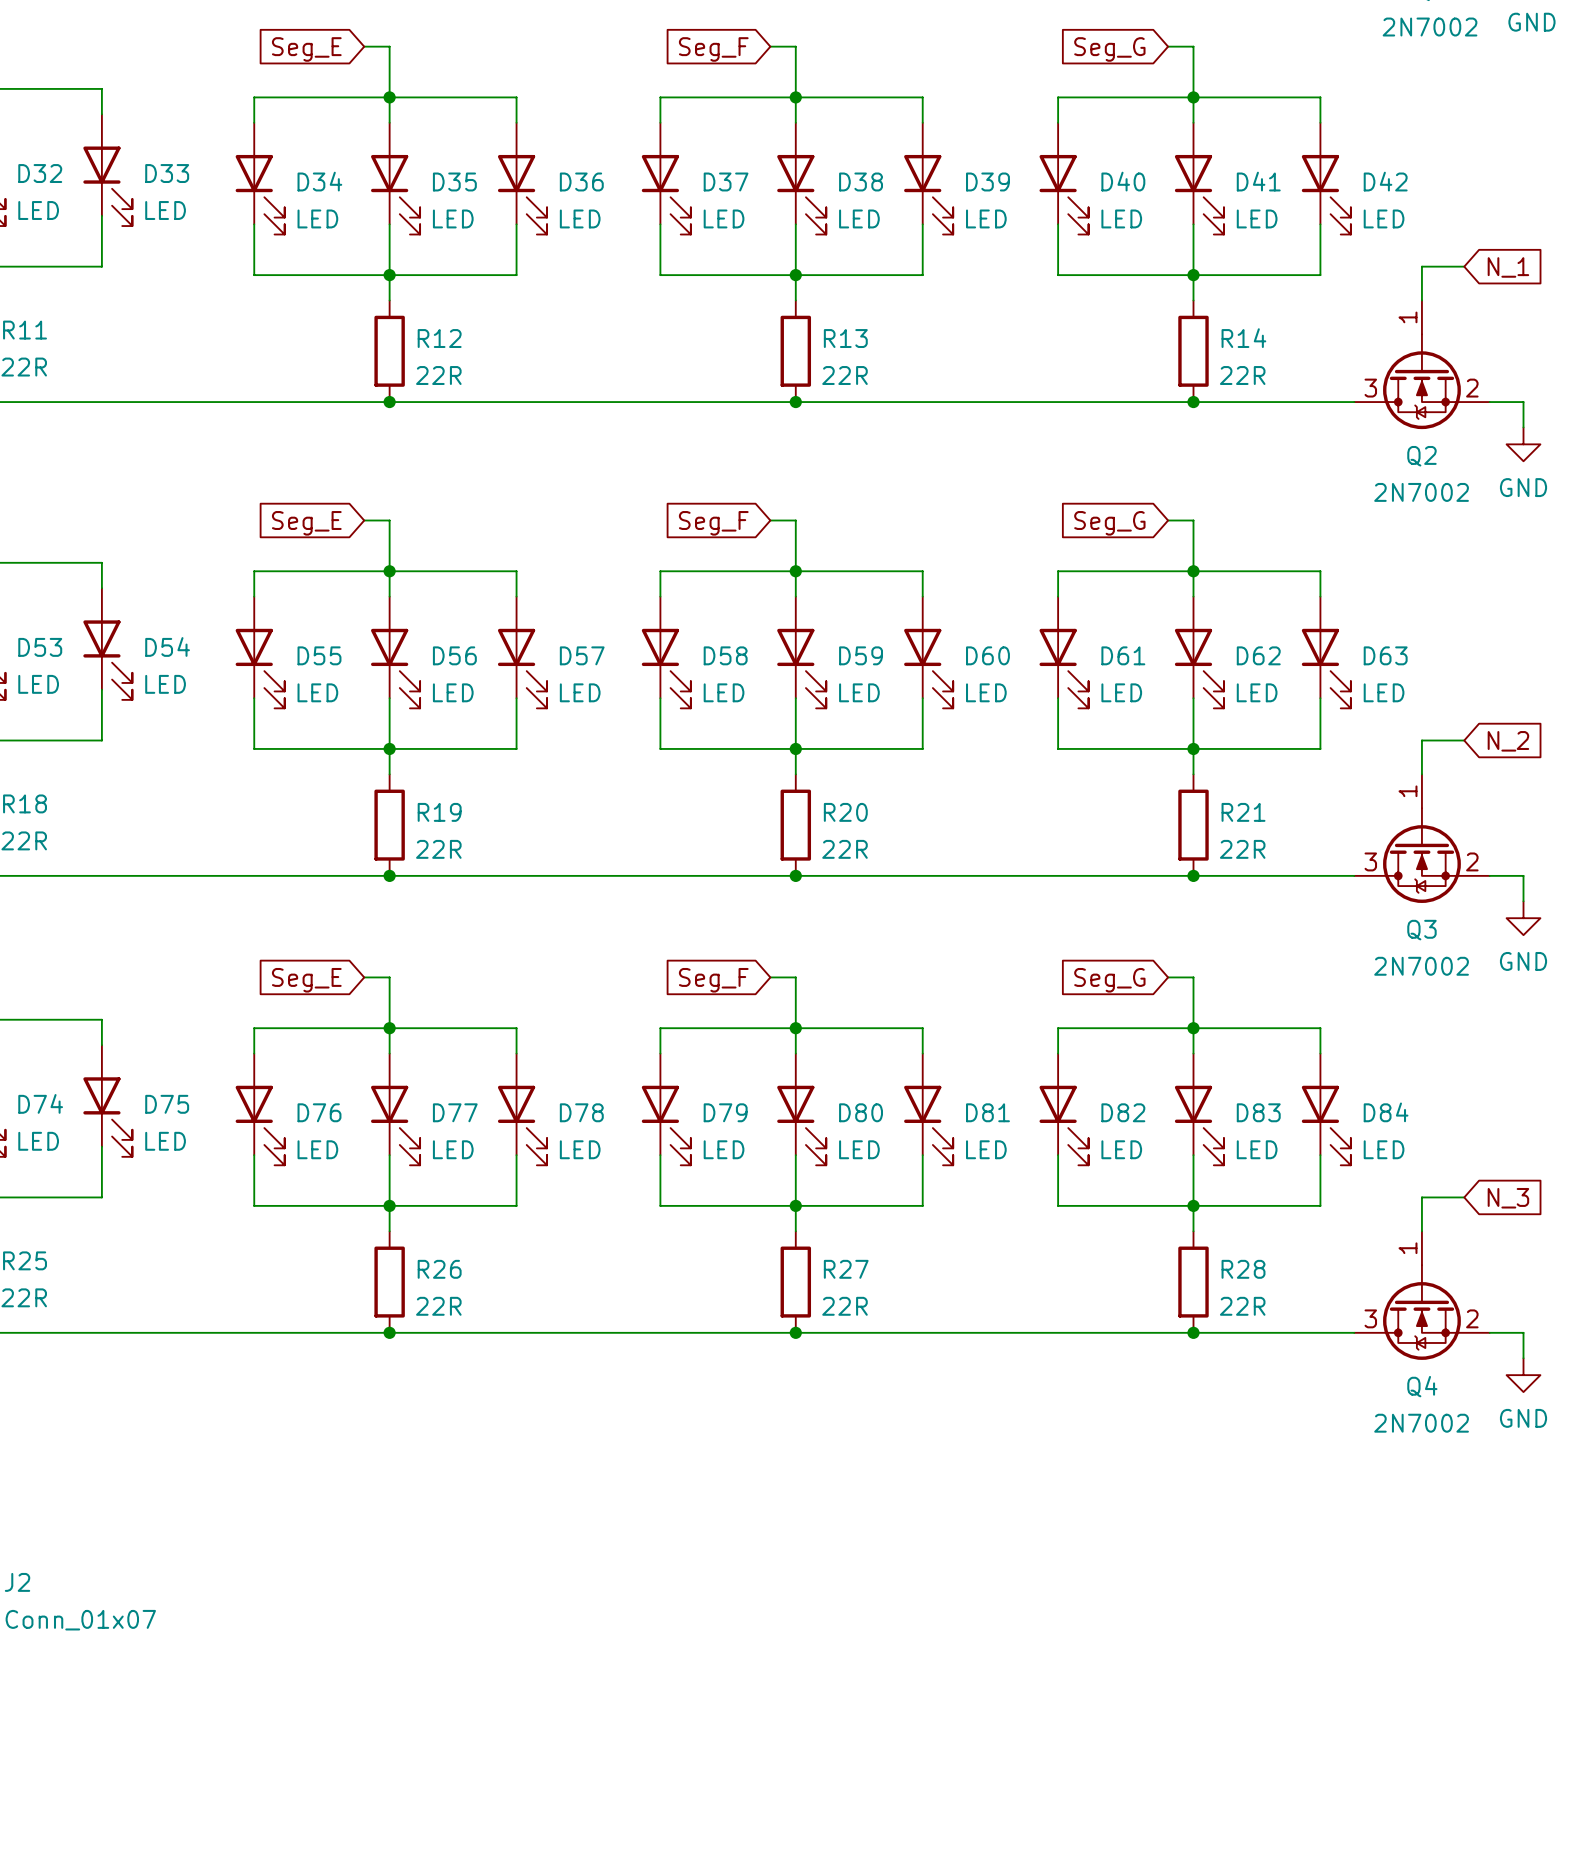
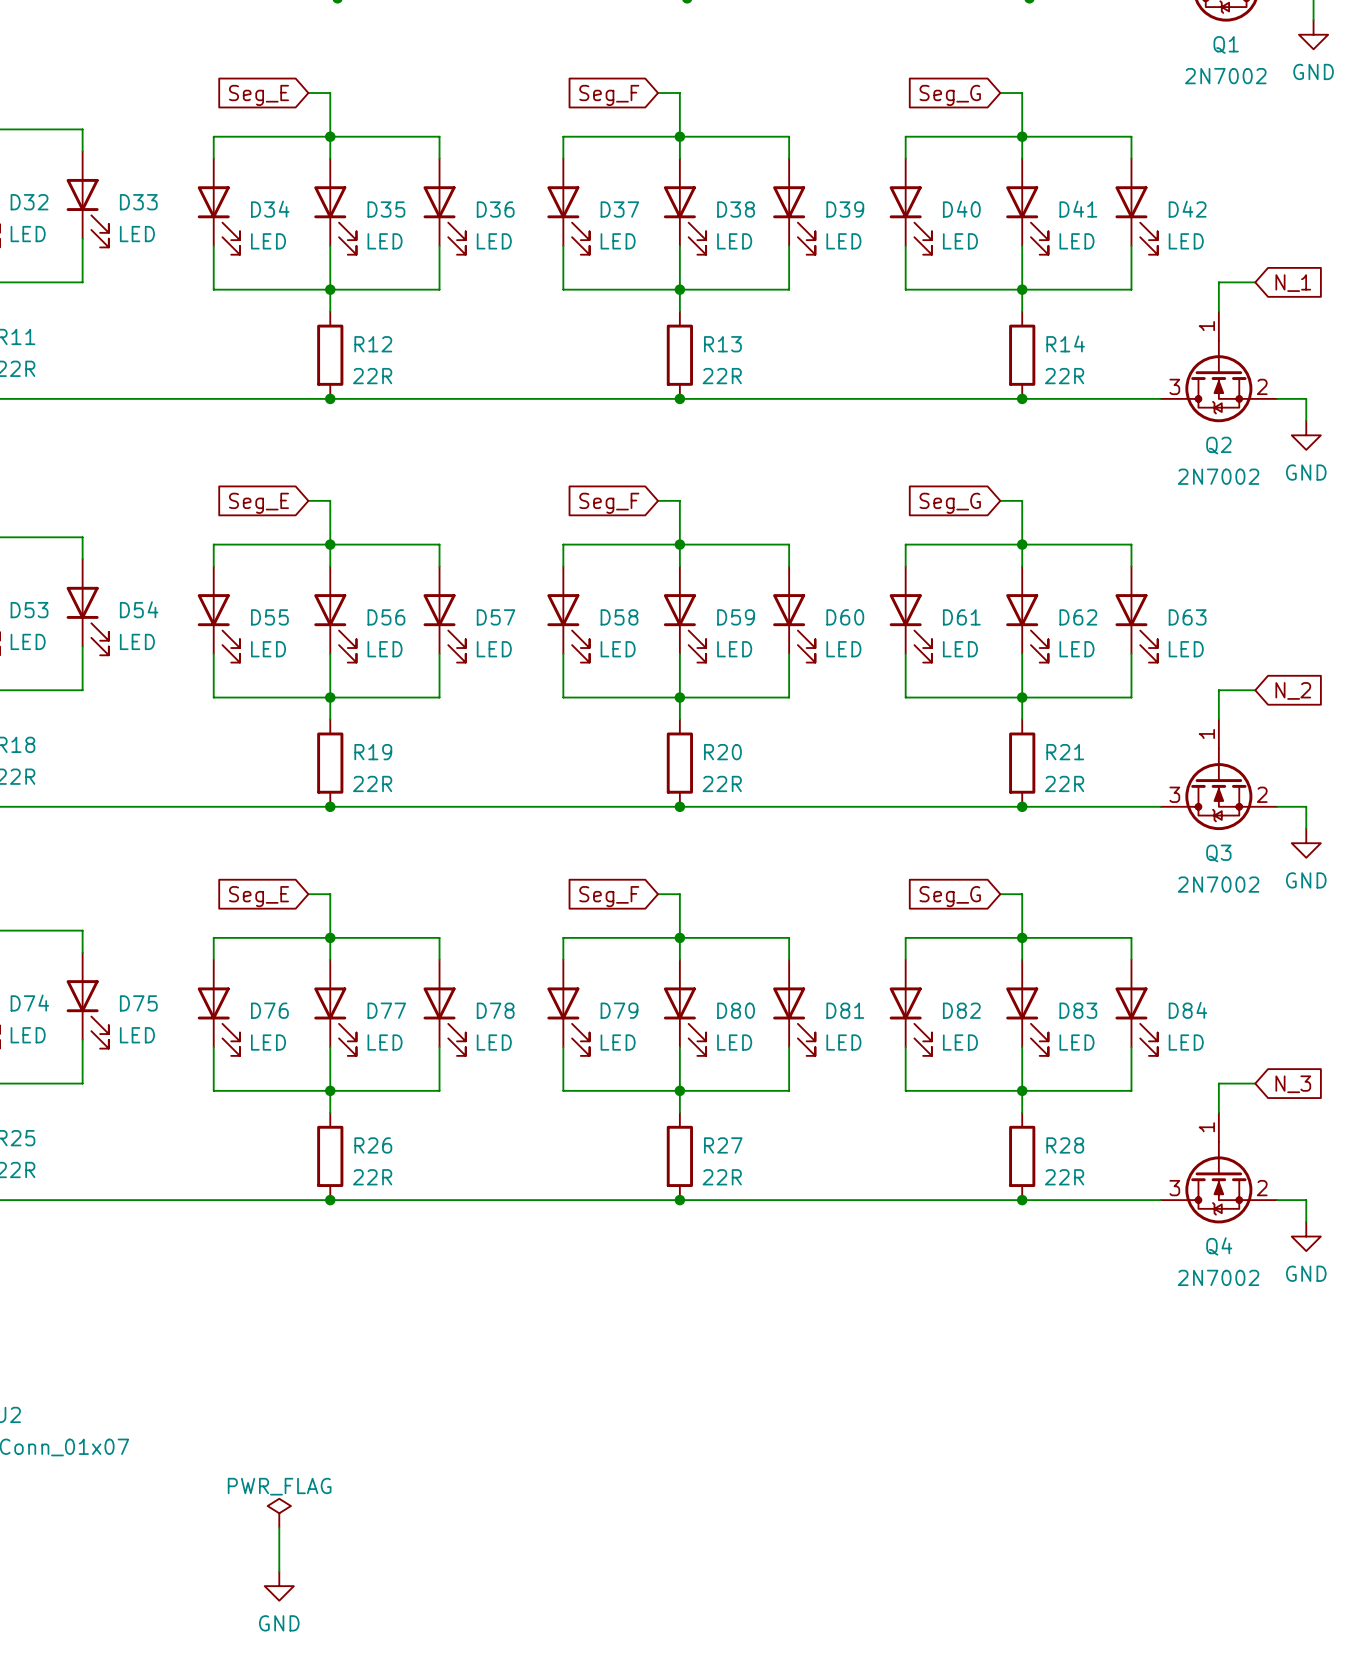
power symbol: none -> PWR_FLAG (279, 1513)
wire: none -> (279, 1527) (279, 1571)
power symbol: none -> GND (279, 1586)

